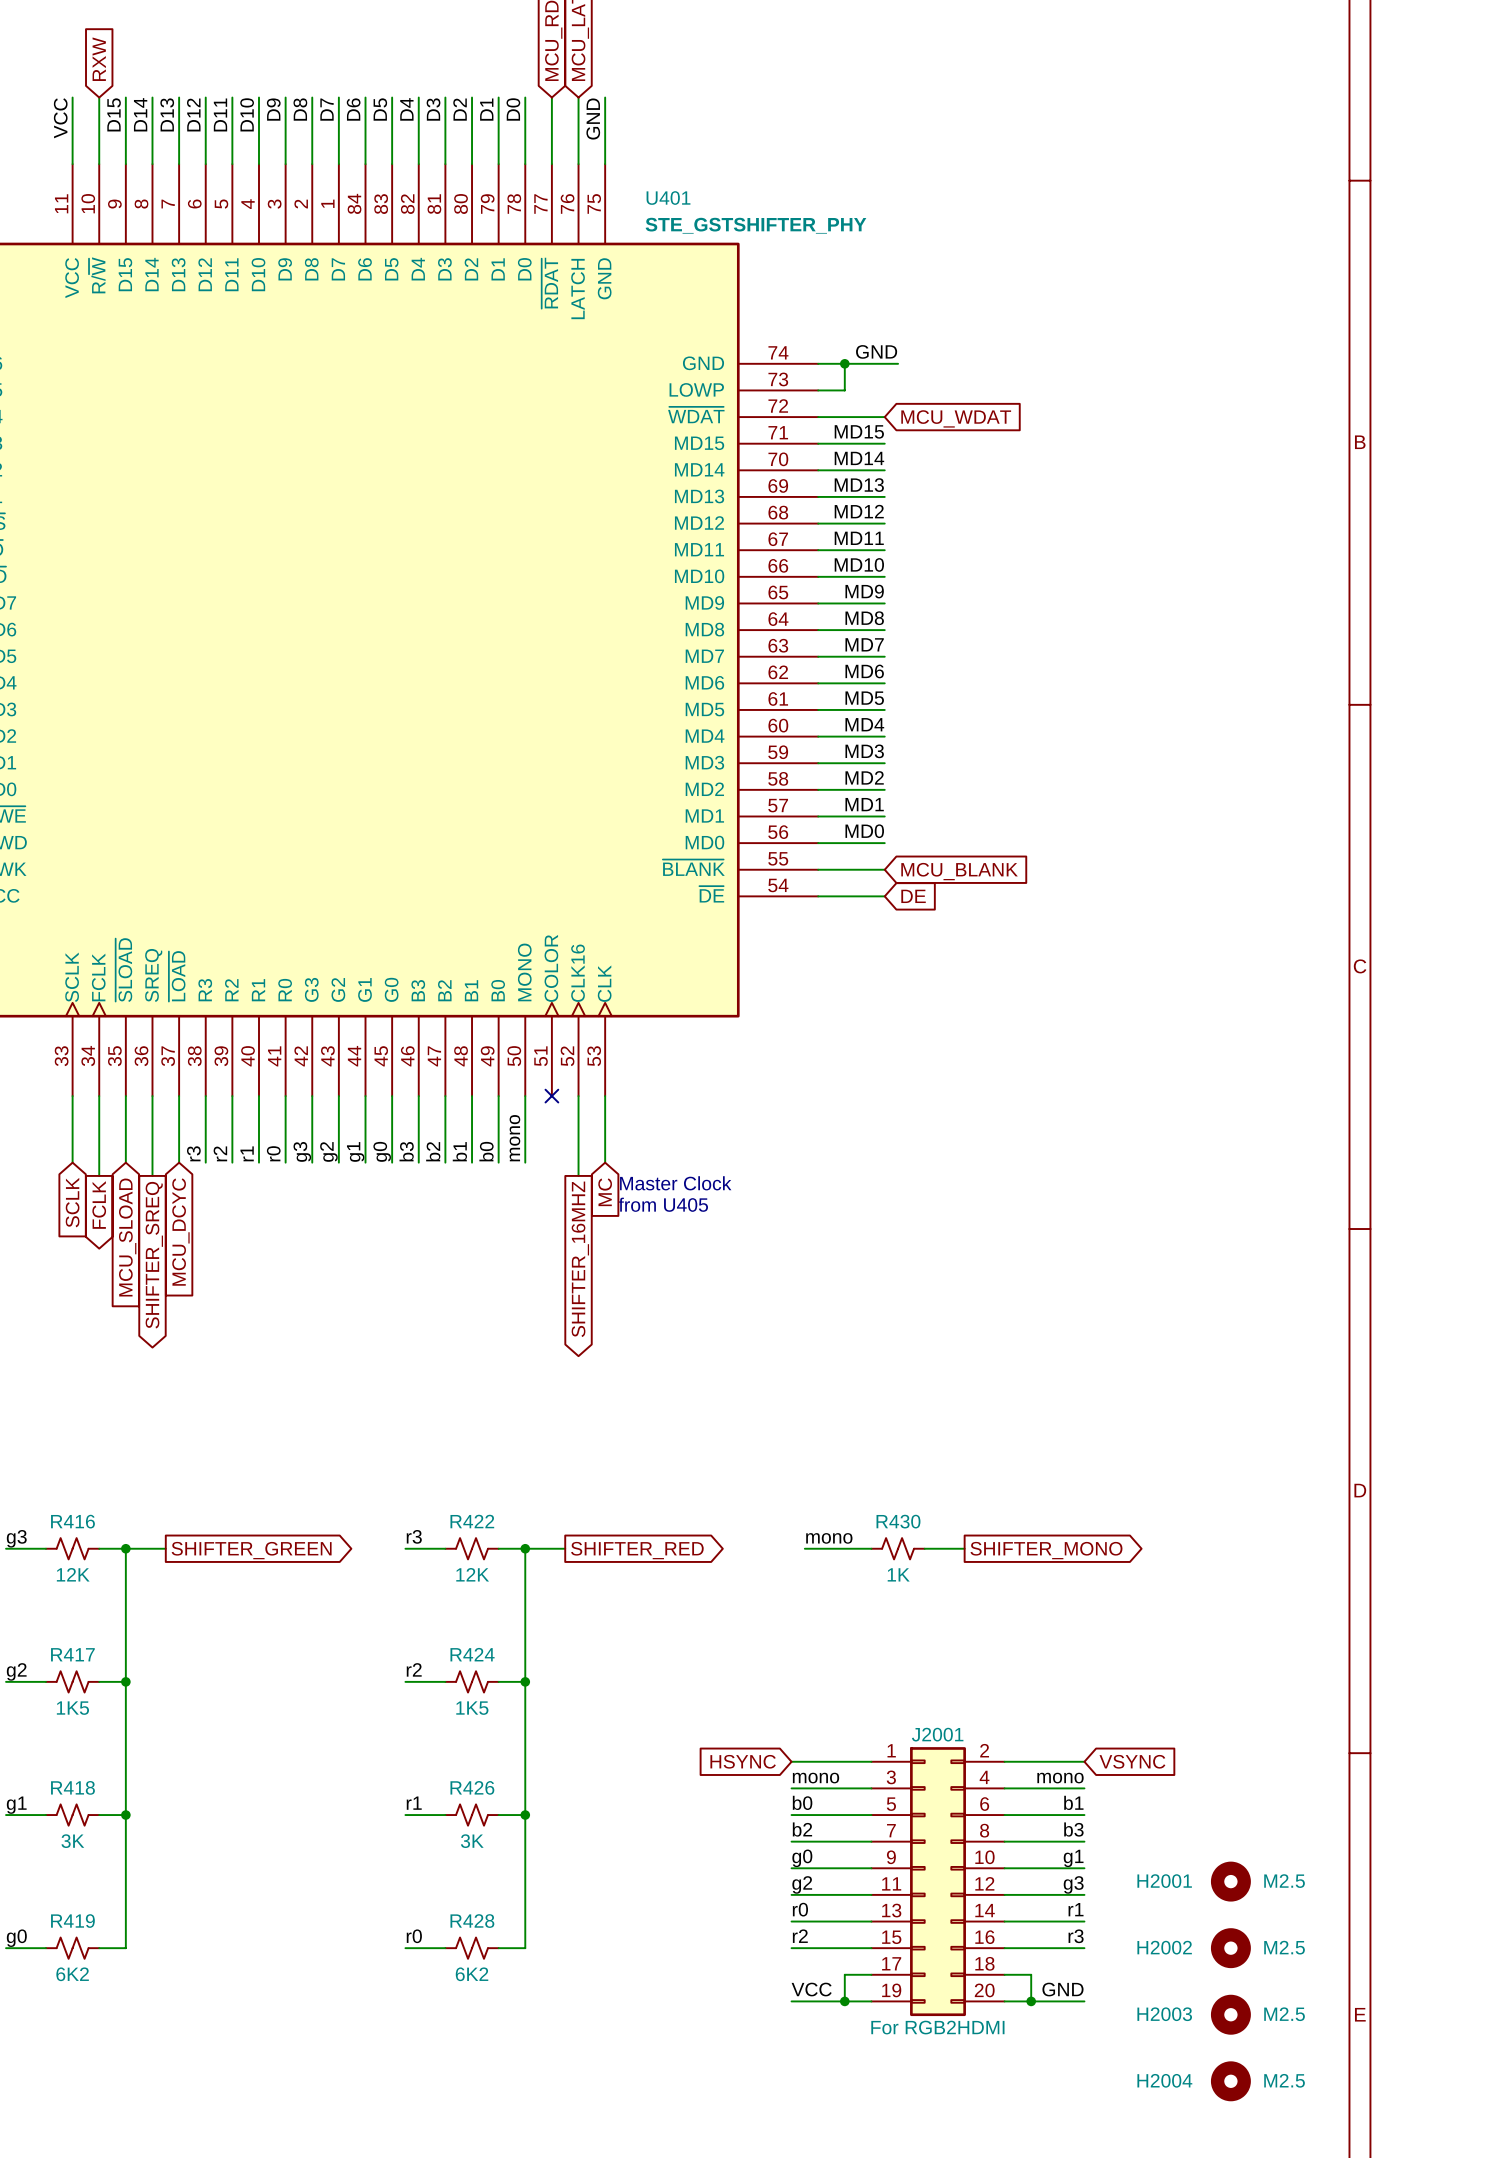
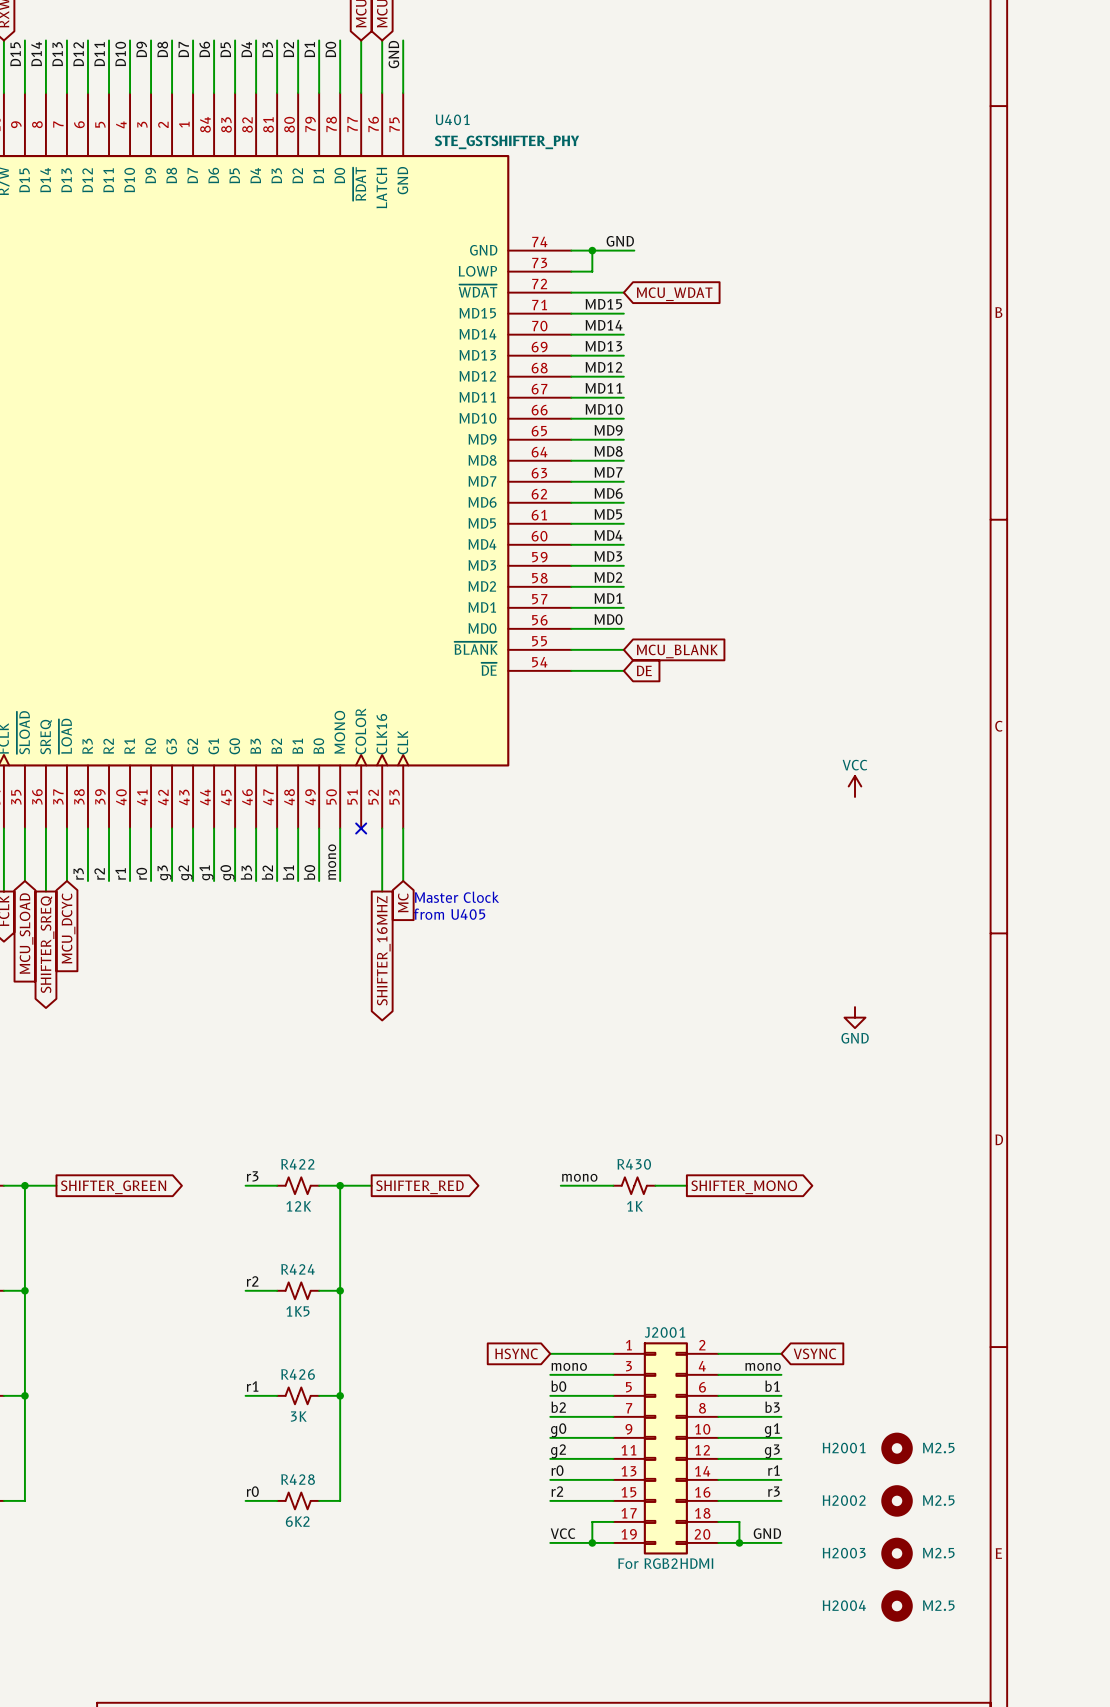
power symbol: none -> VCC (855, 786)
power symbol: none -> GND (855, 1017)

